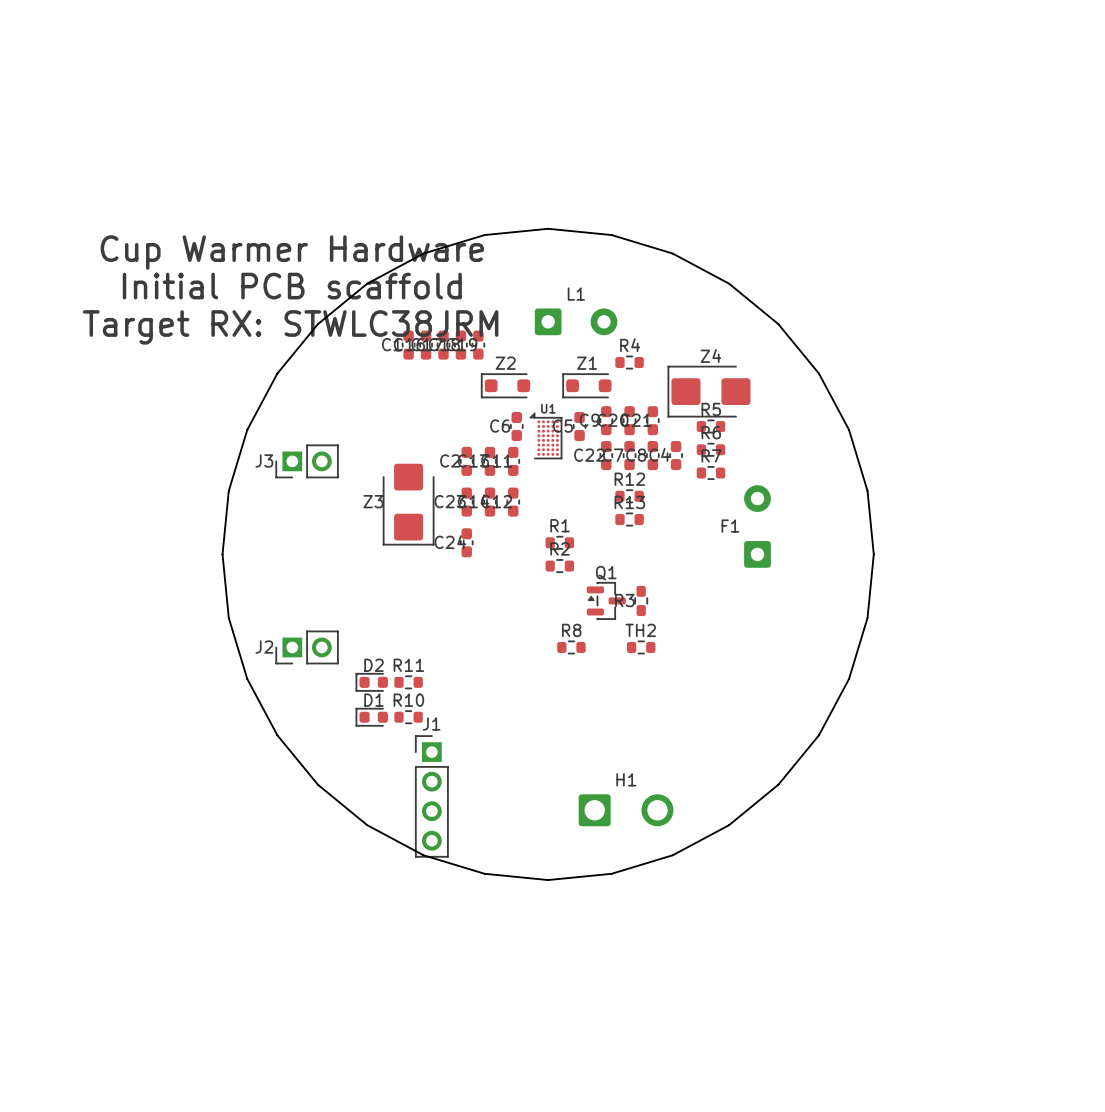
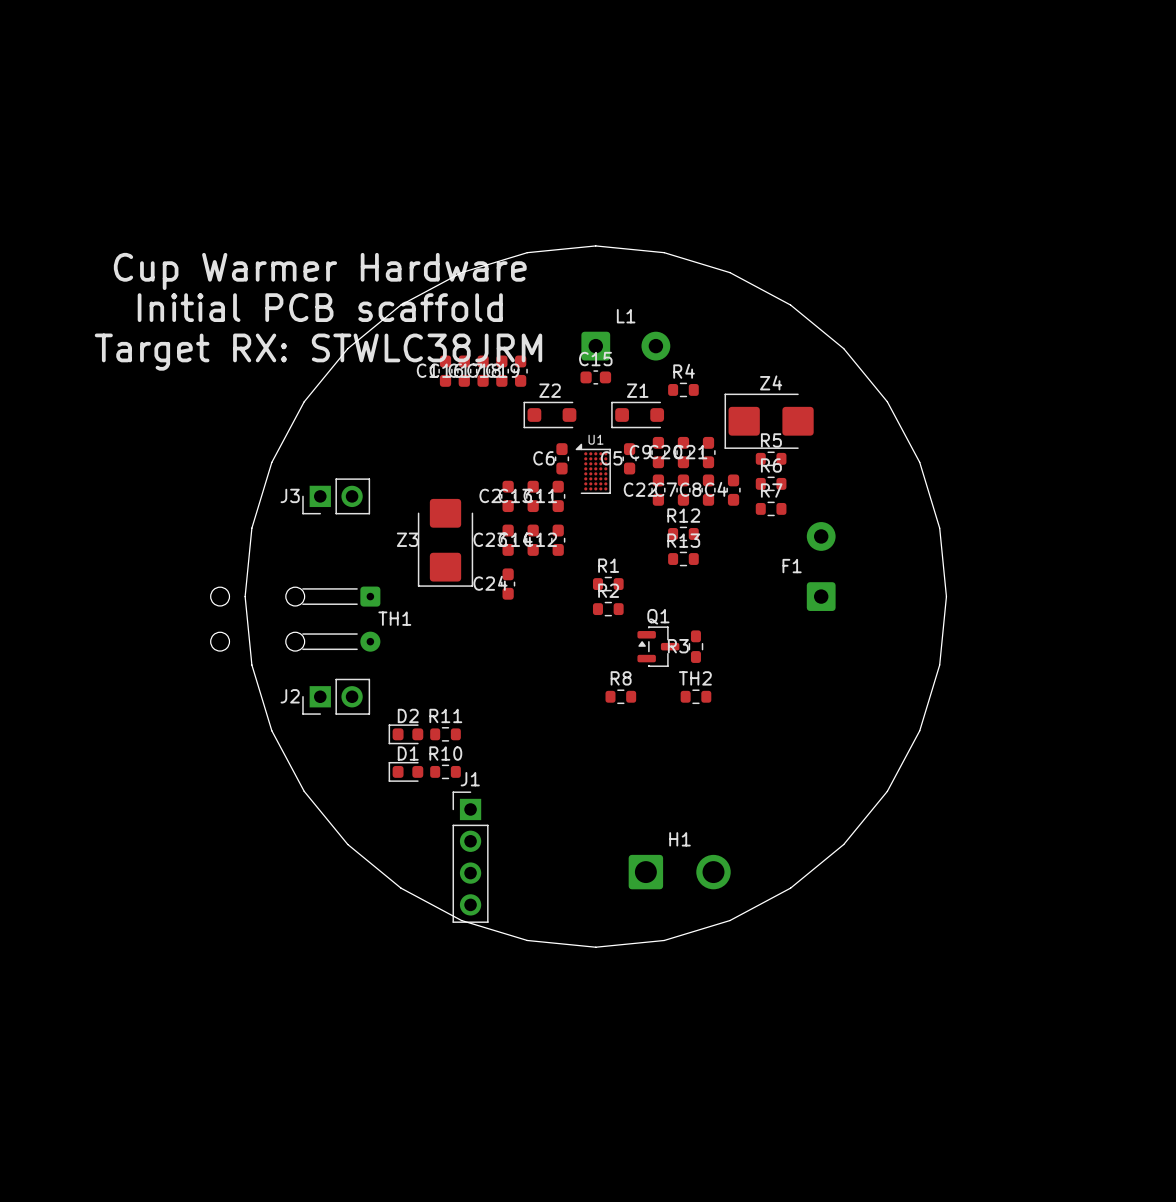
C15: none -> (595, 377)
TH1: none -> (295, 619)

